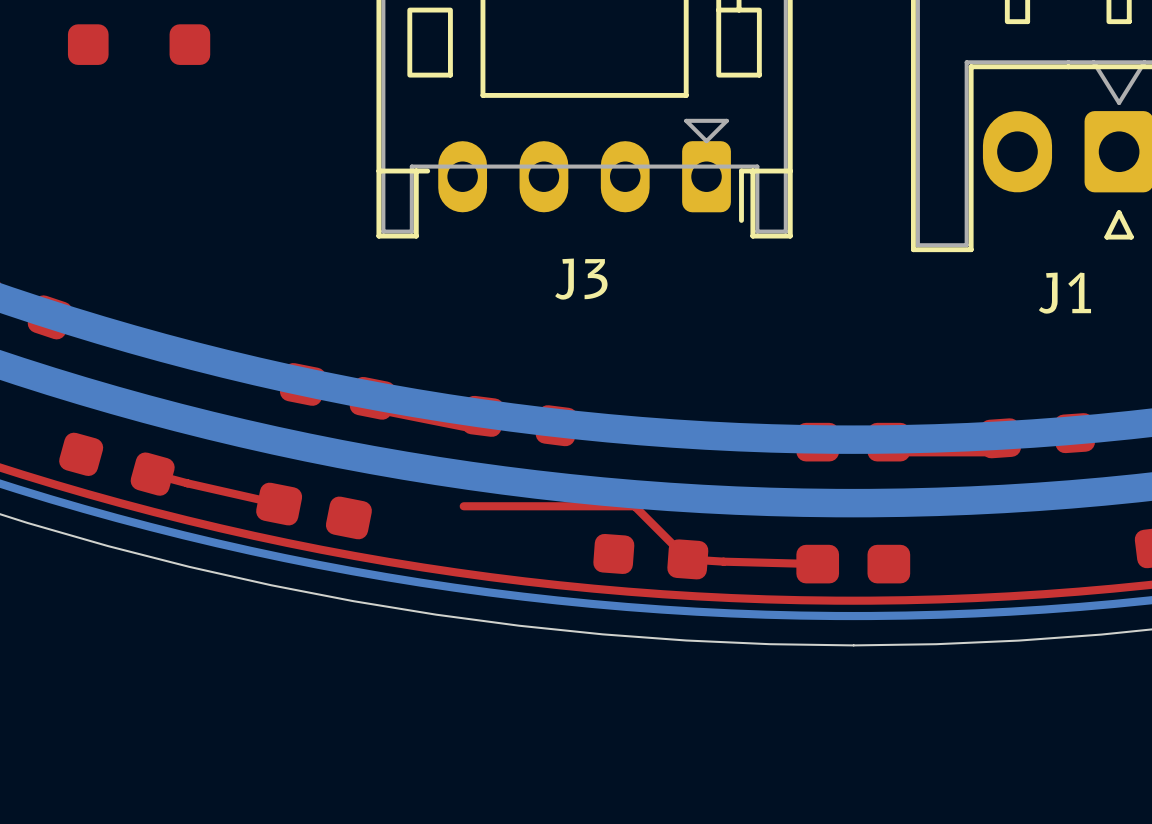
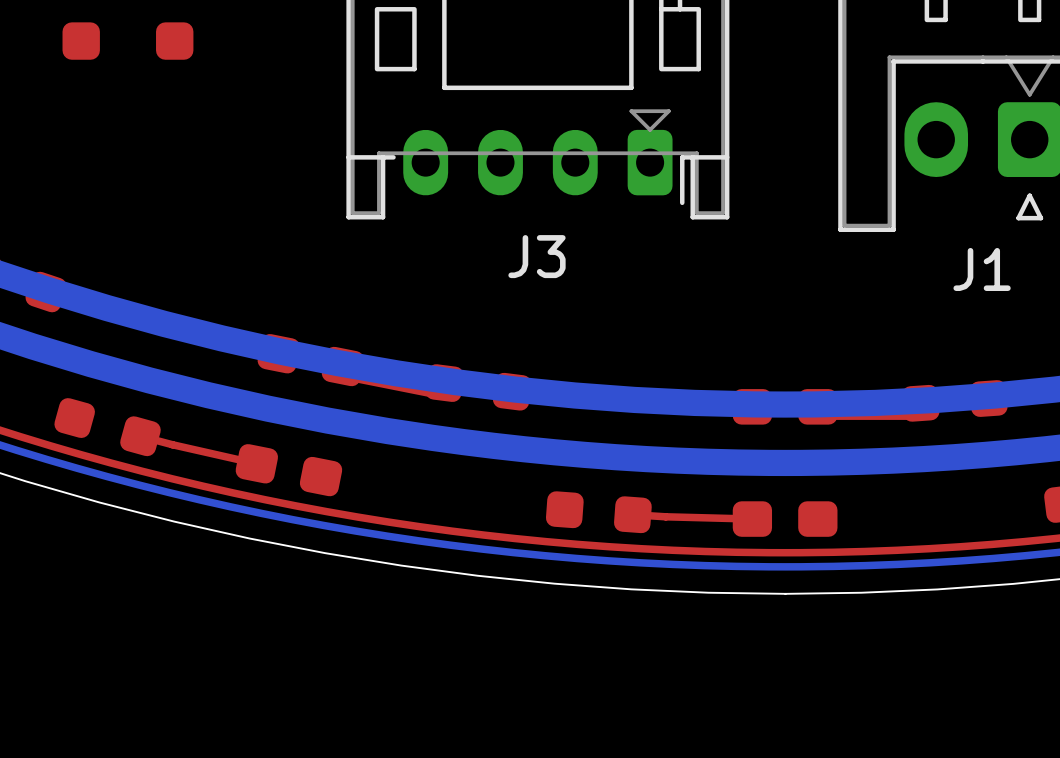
top track: (463, 506) (634, 506) (687, 559) -> none

